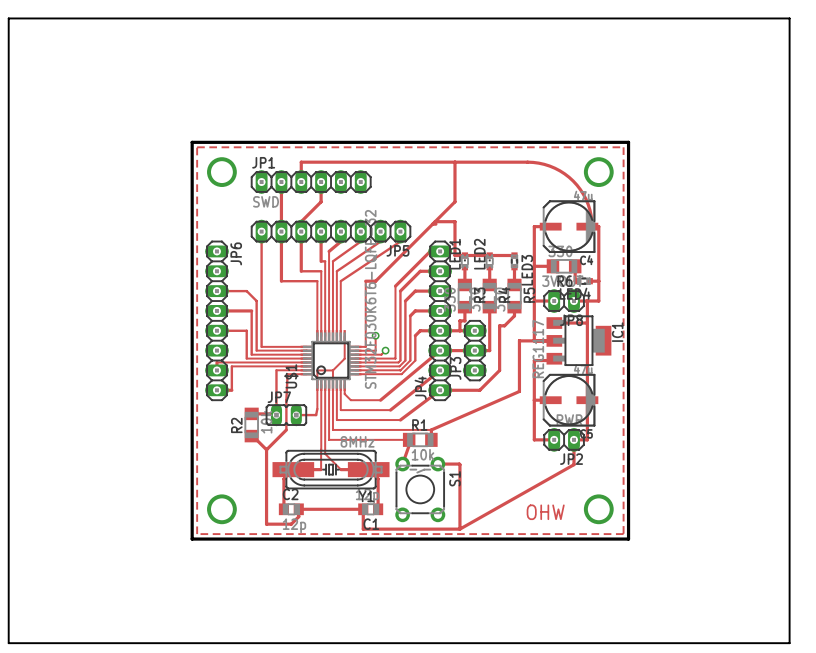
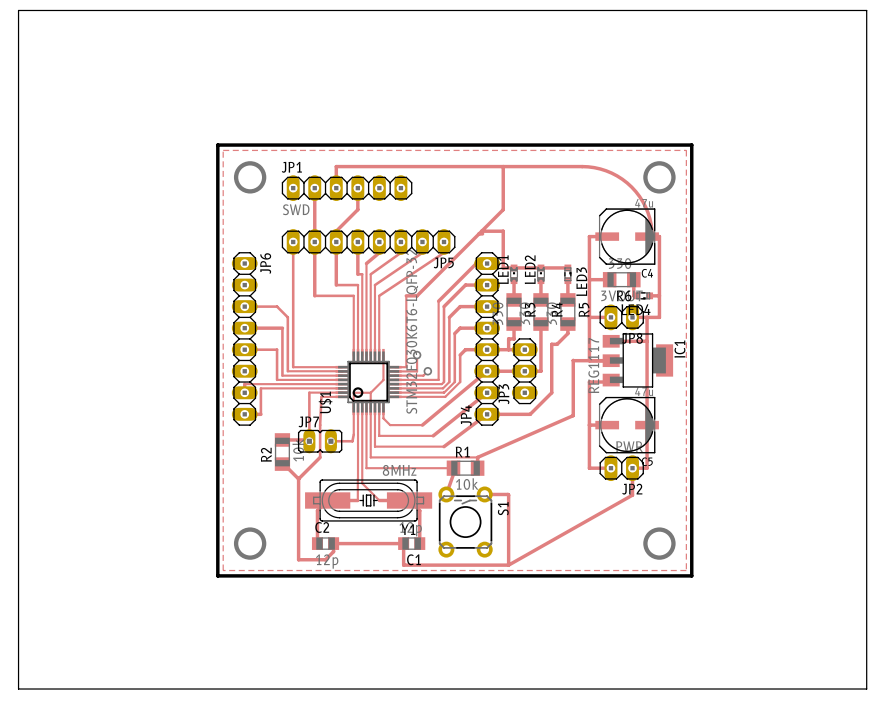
text: OHW (545, 512) -> none

